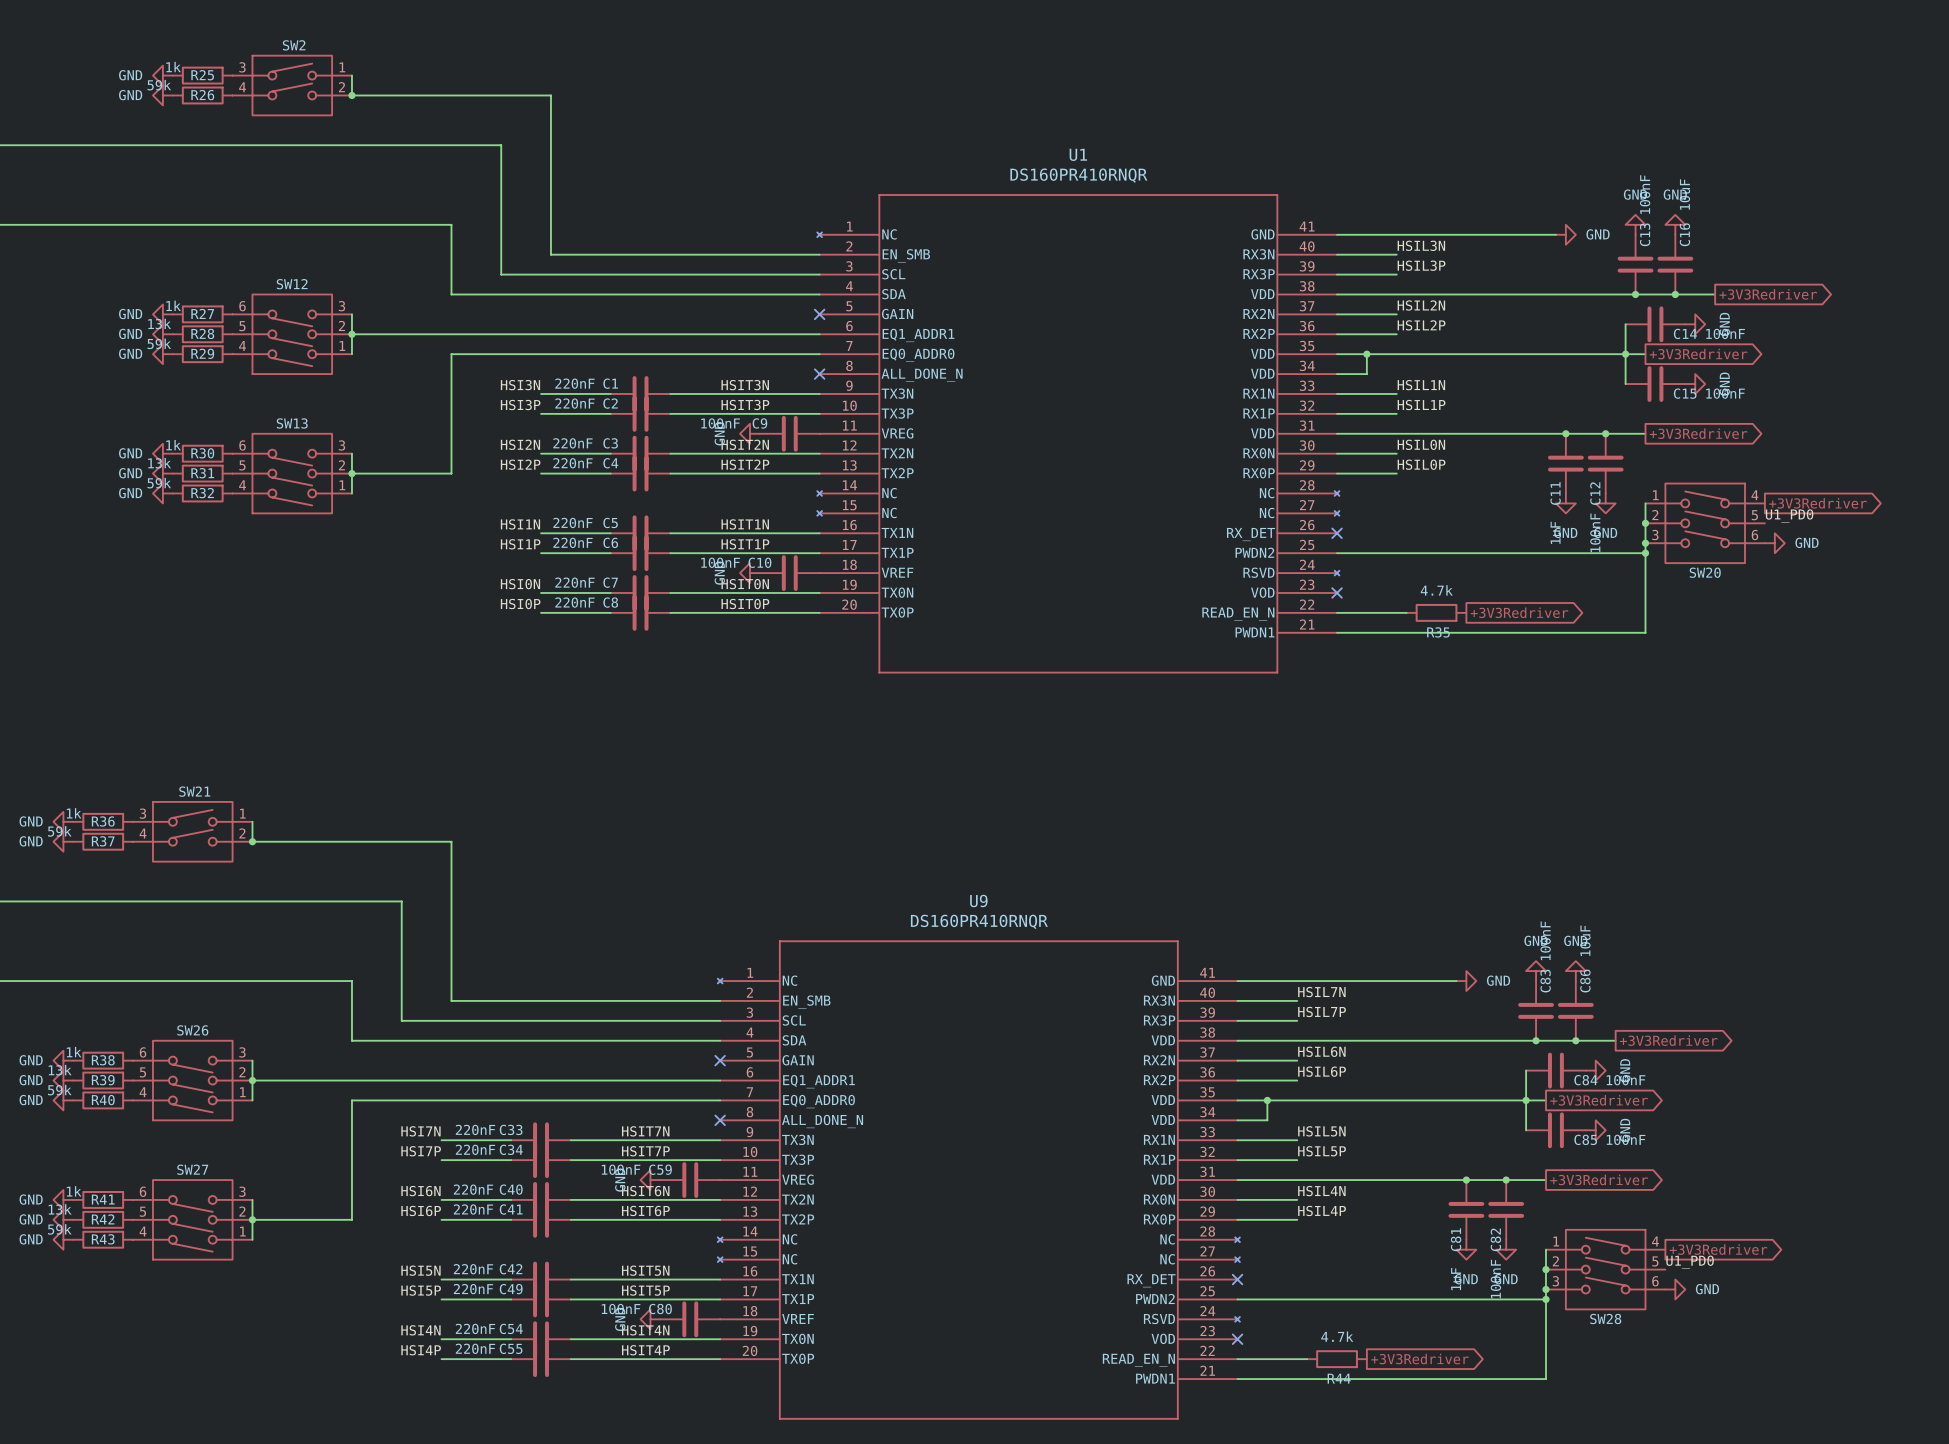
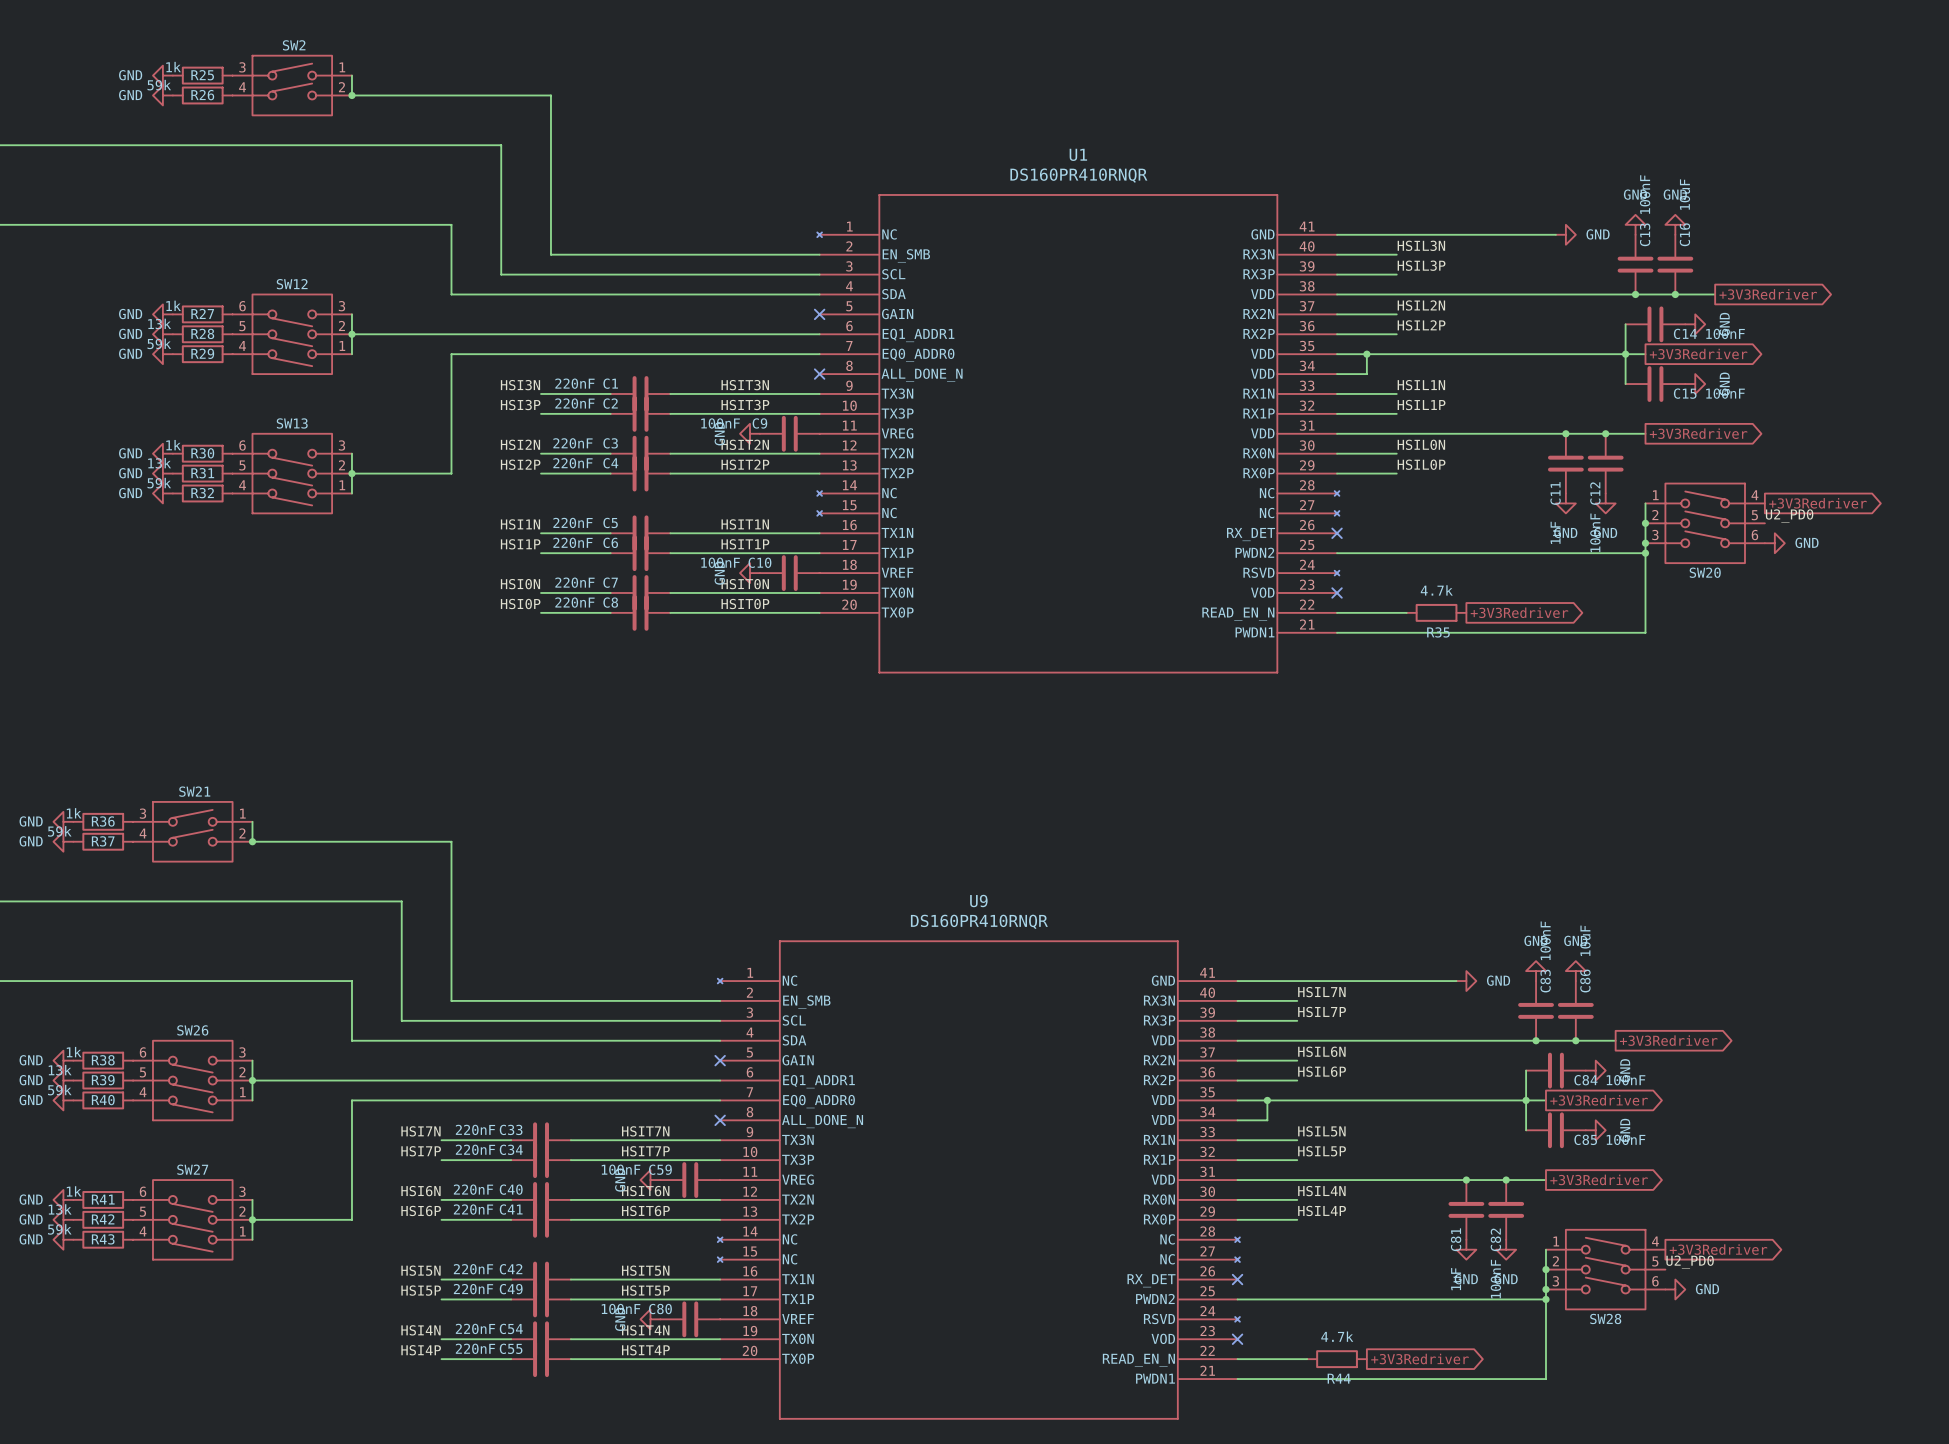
label: U1_PD0 (1789, 515) -> U2_PD0 (1789, 515)
label: U1_PD0 (1690, 1262) -> U2_PD0 (1690, 1262)

